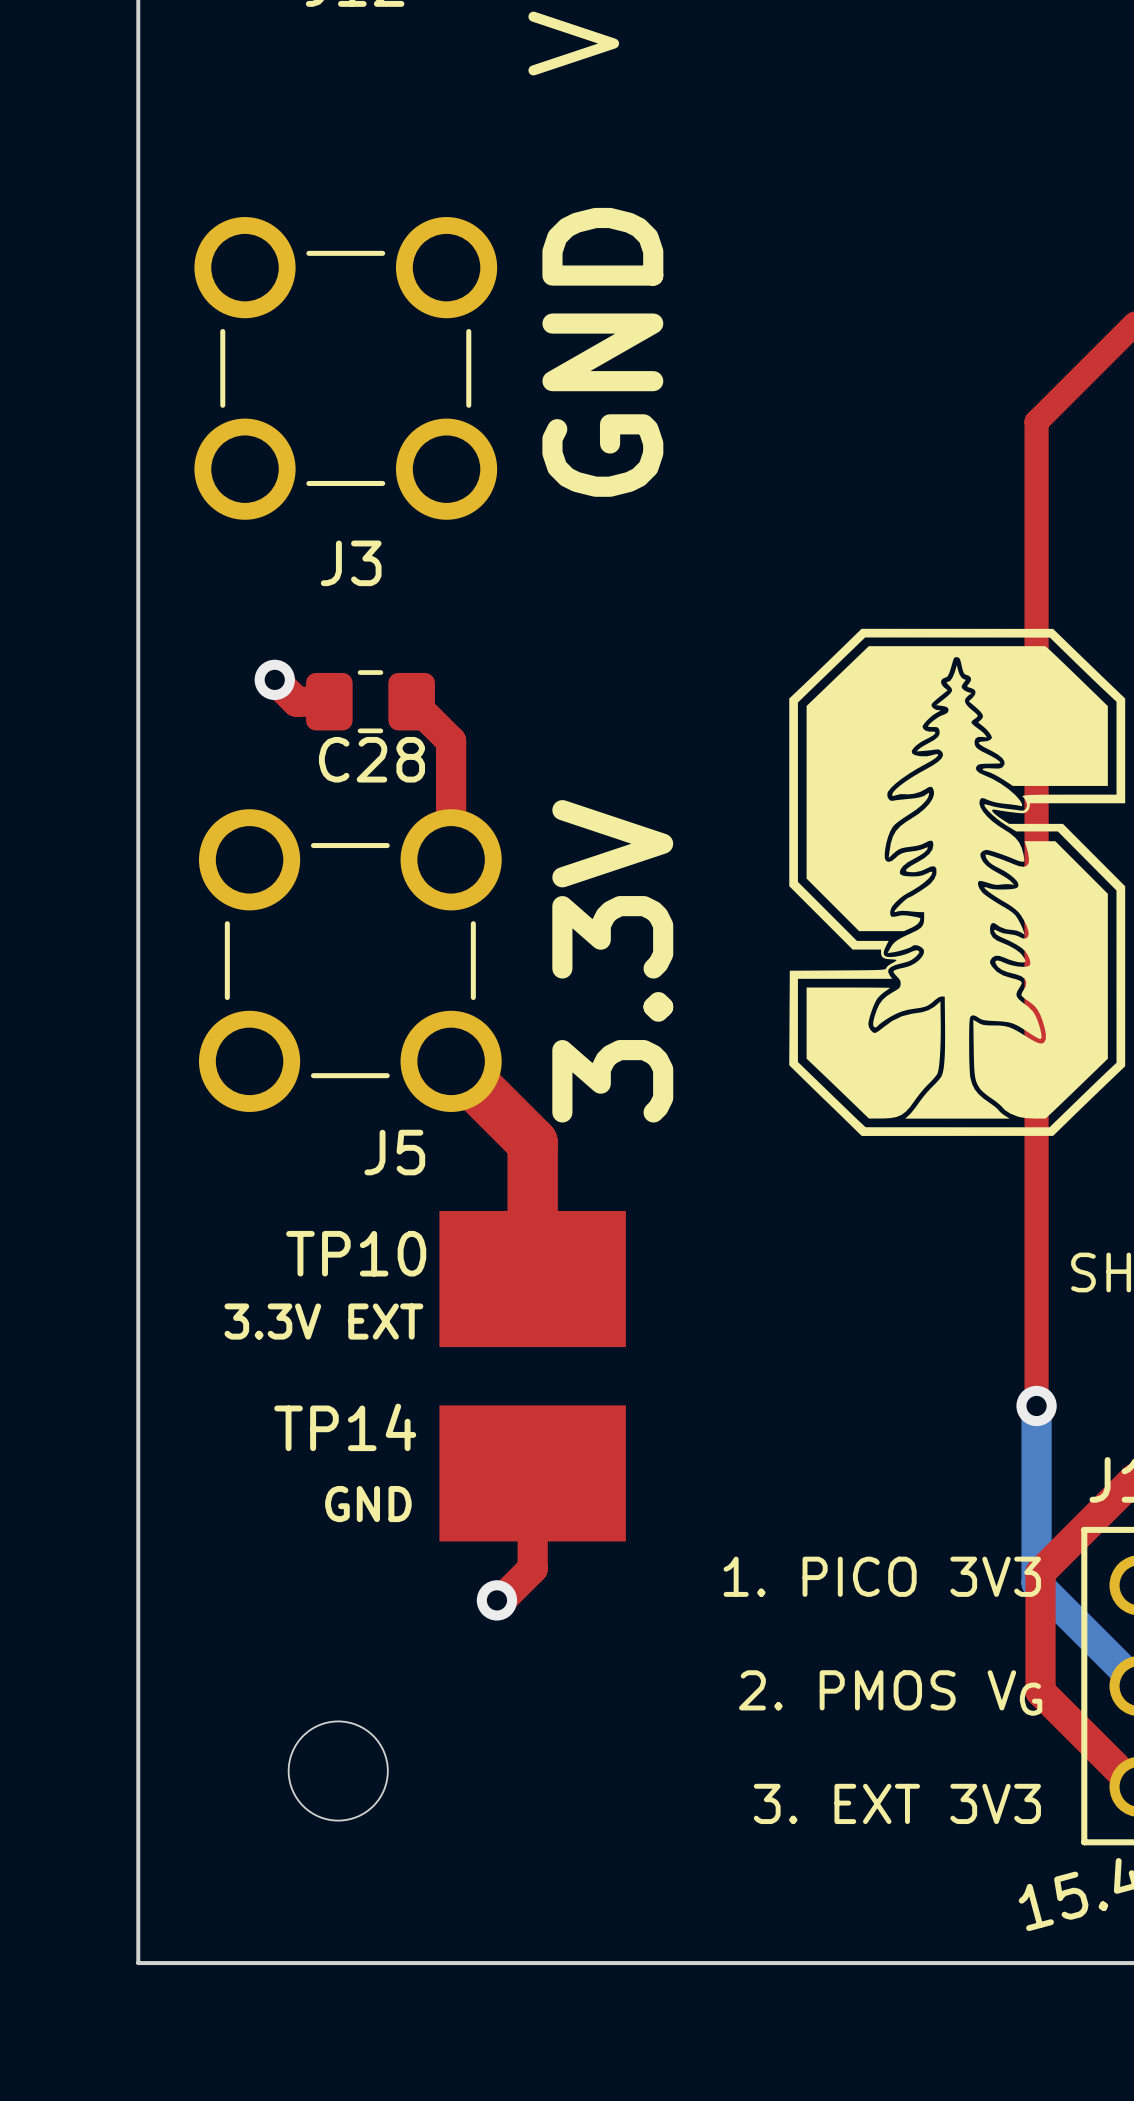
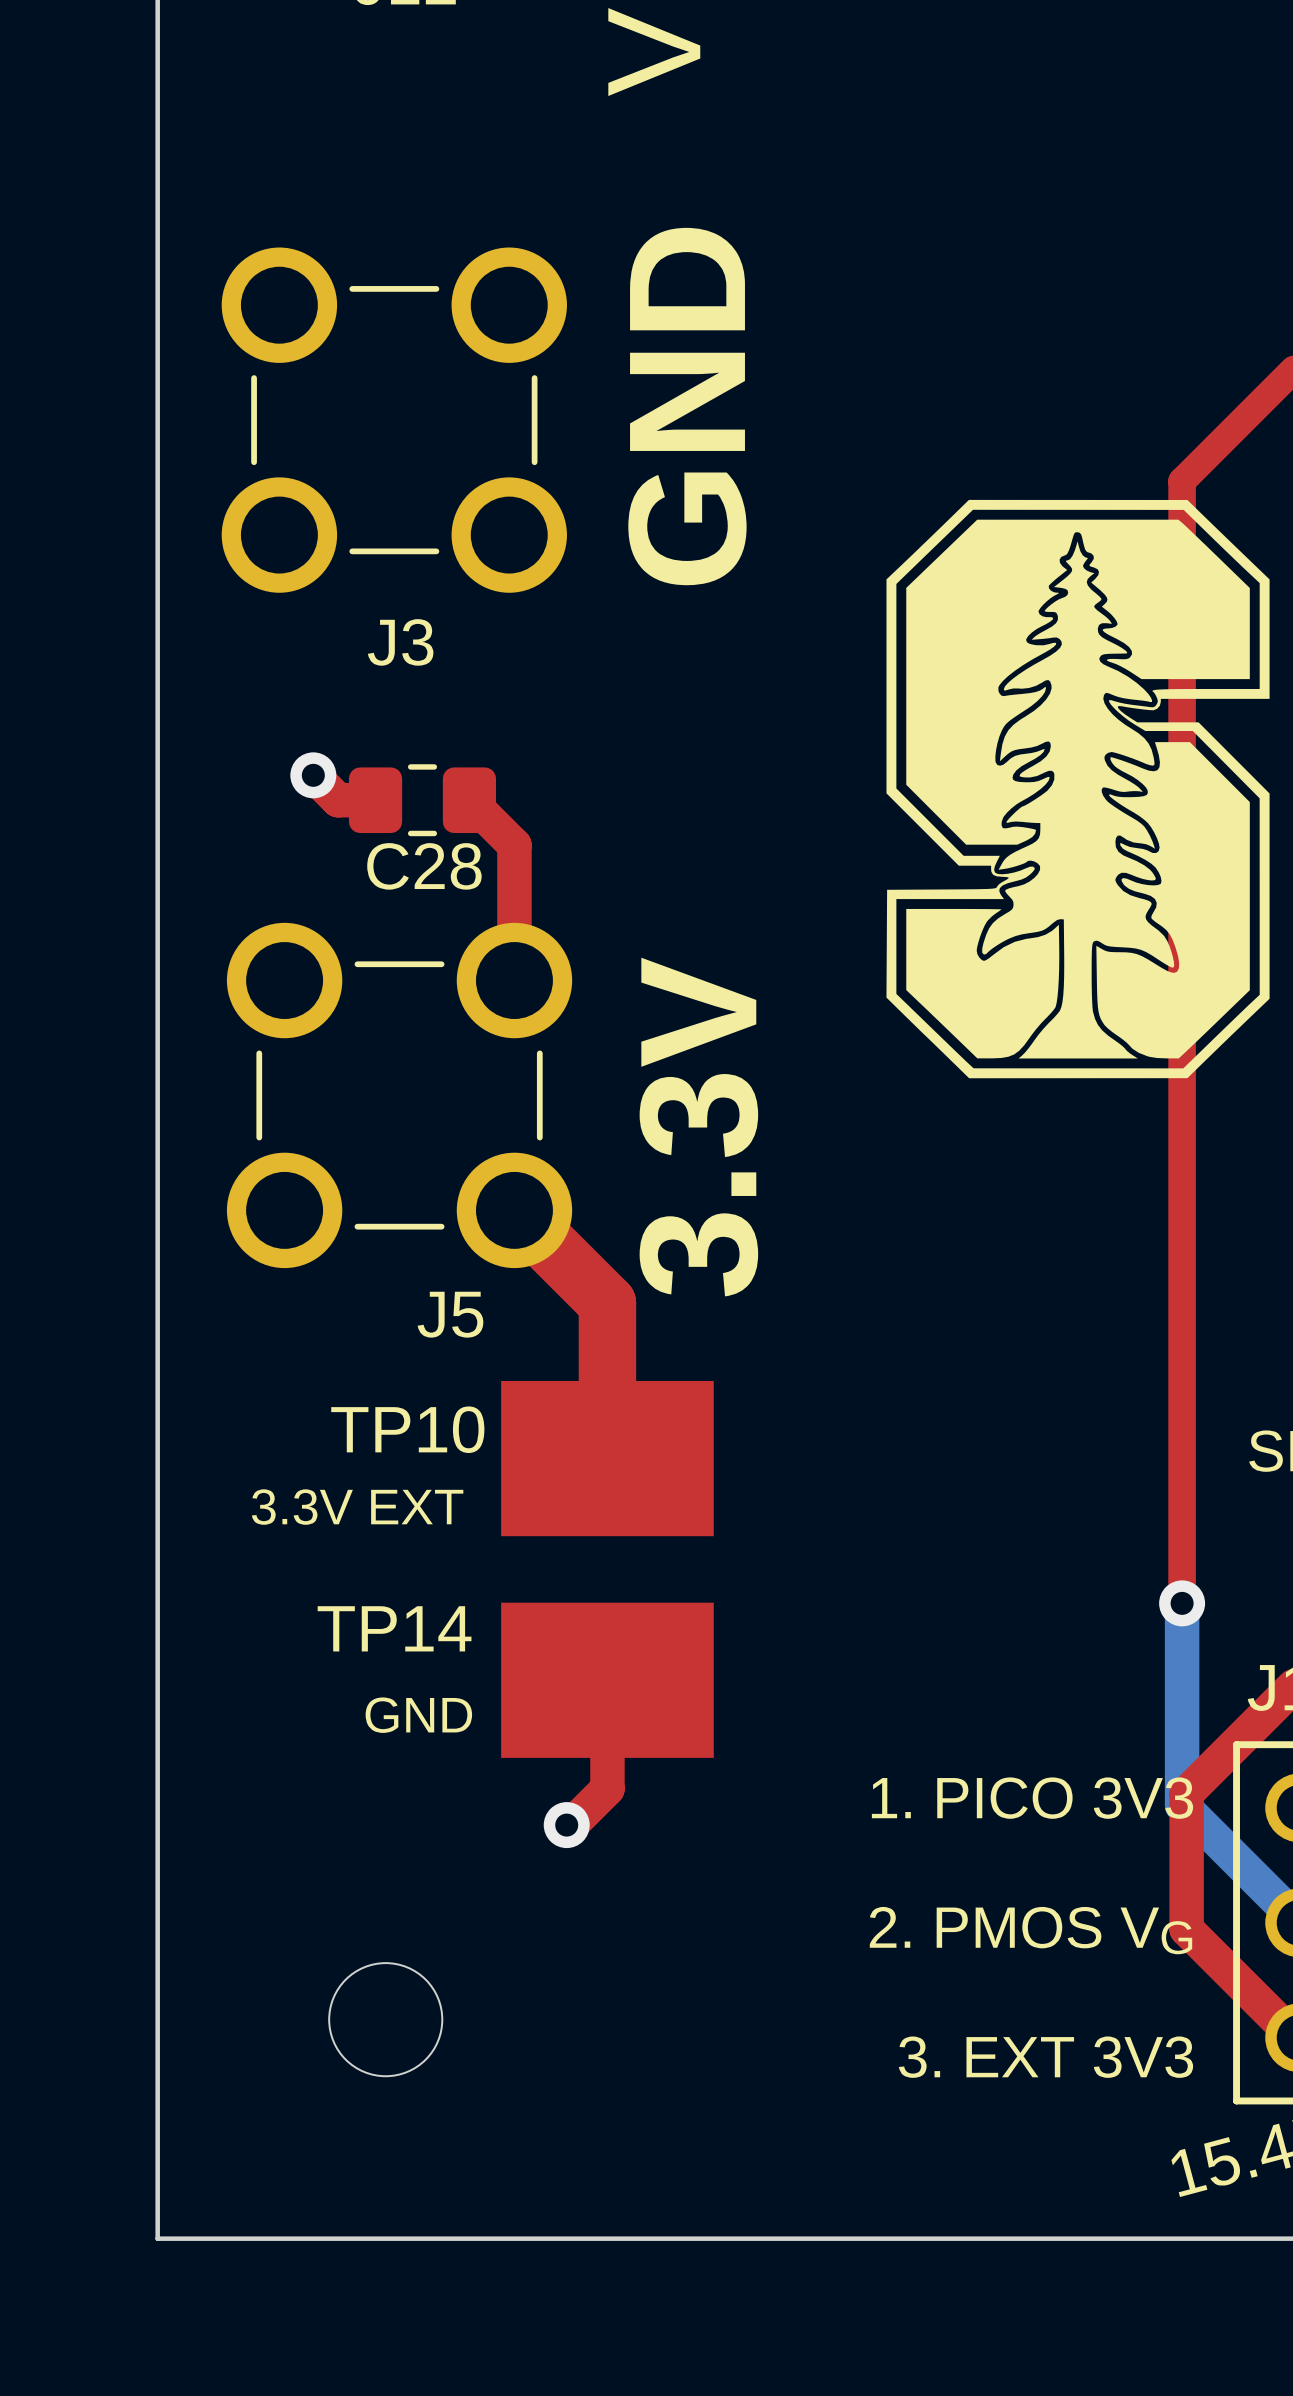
drawing position: (957, 882) -> (1078, 789)

